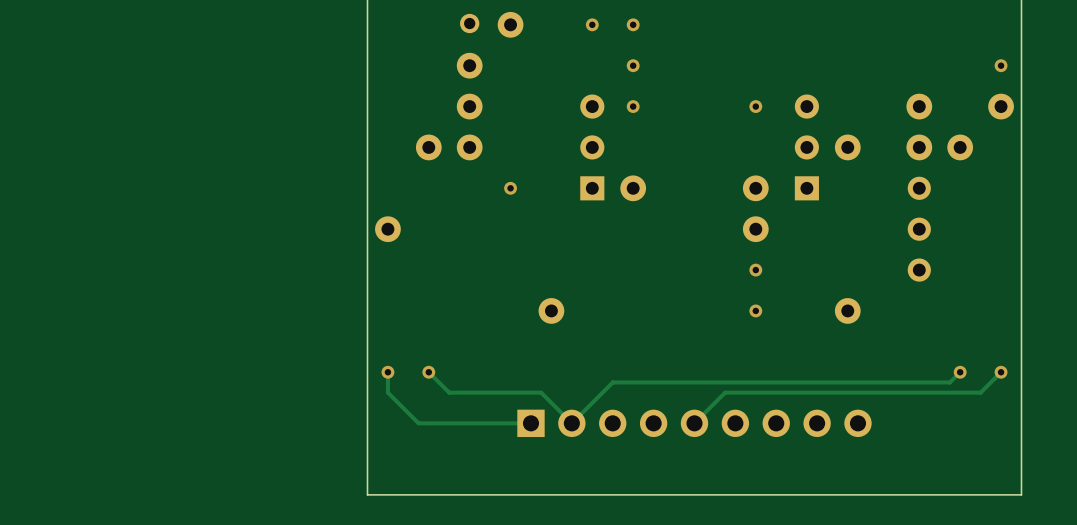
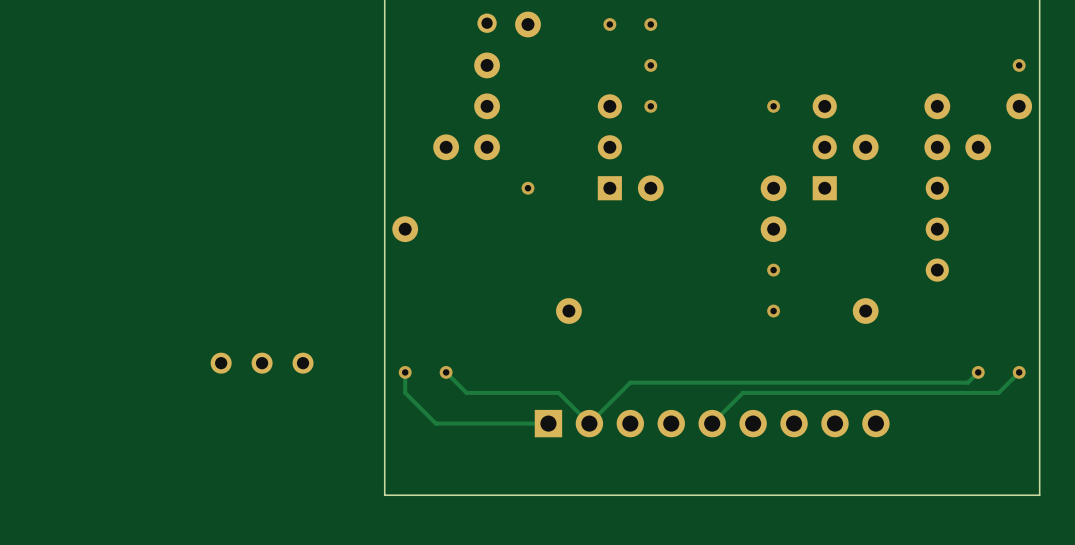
part: none -> (262, 363)

